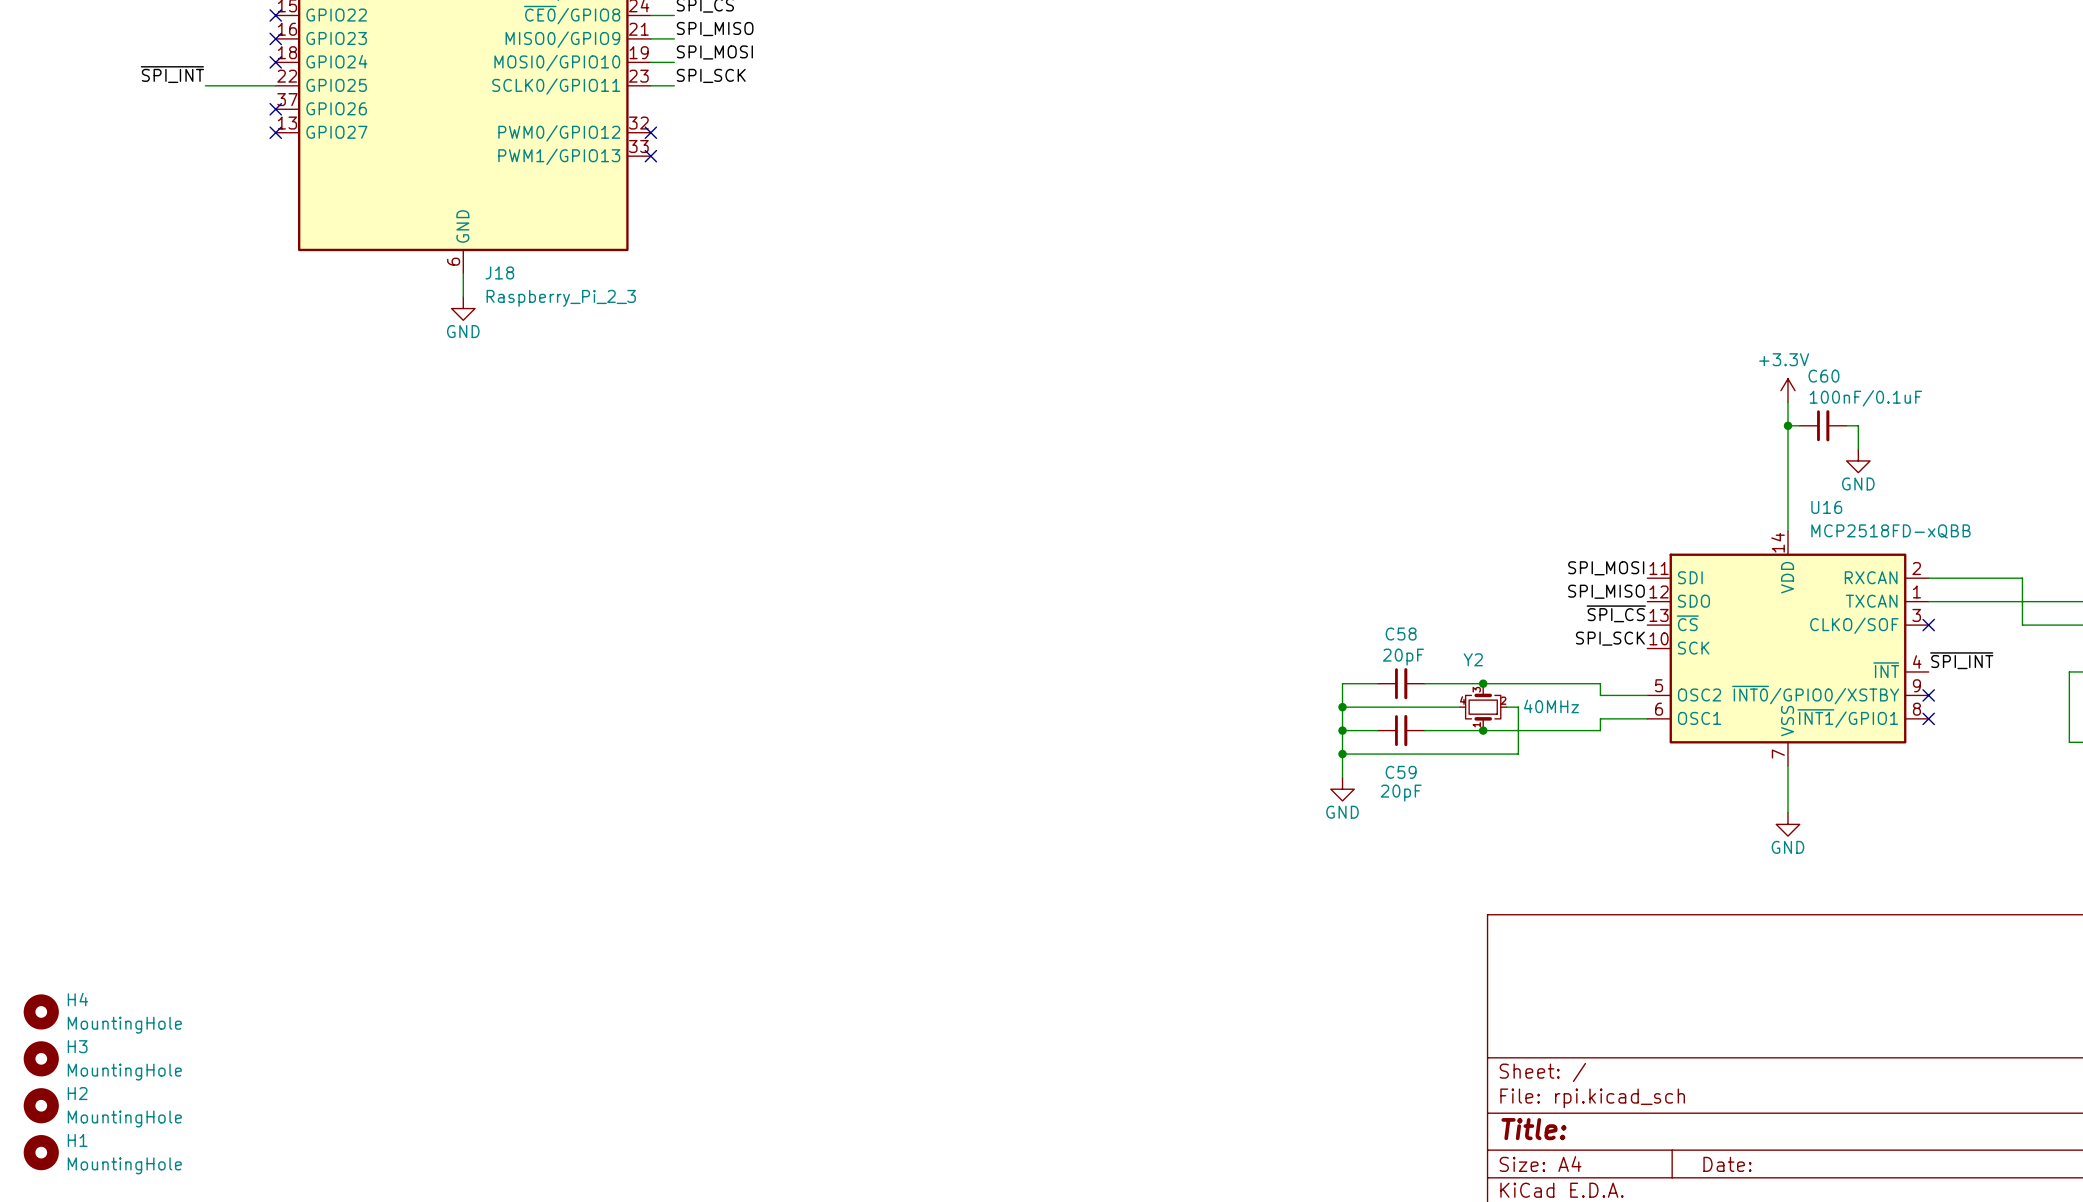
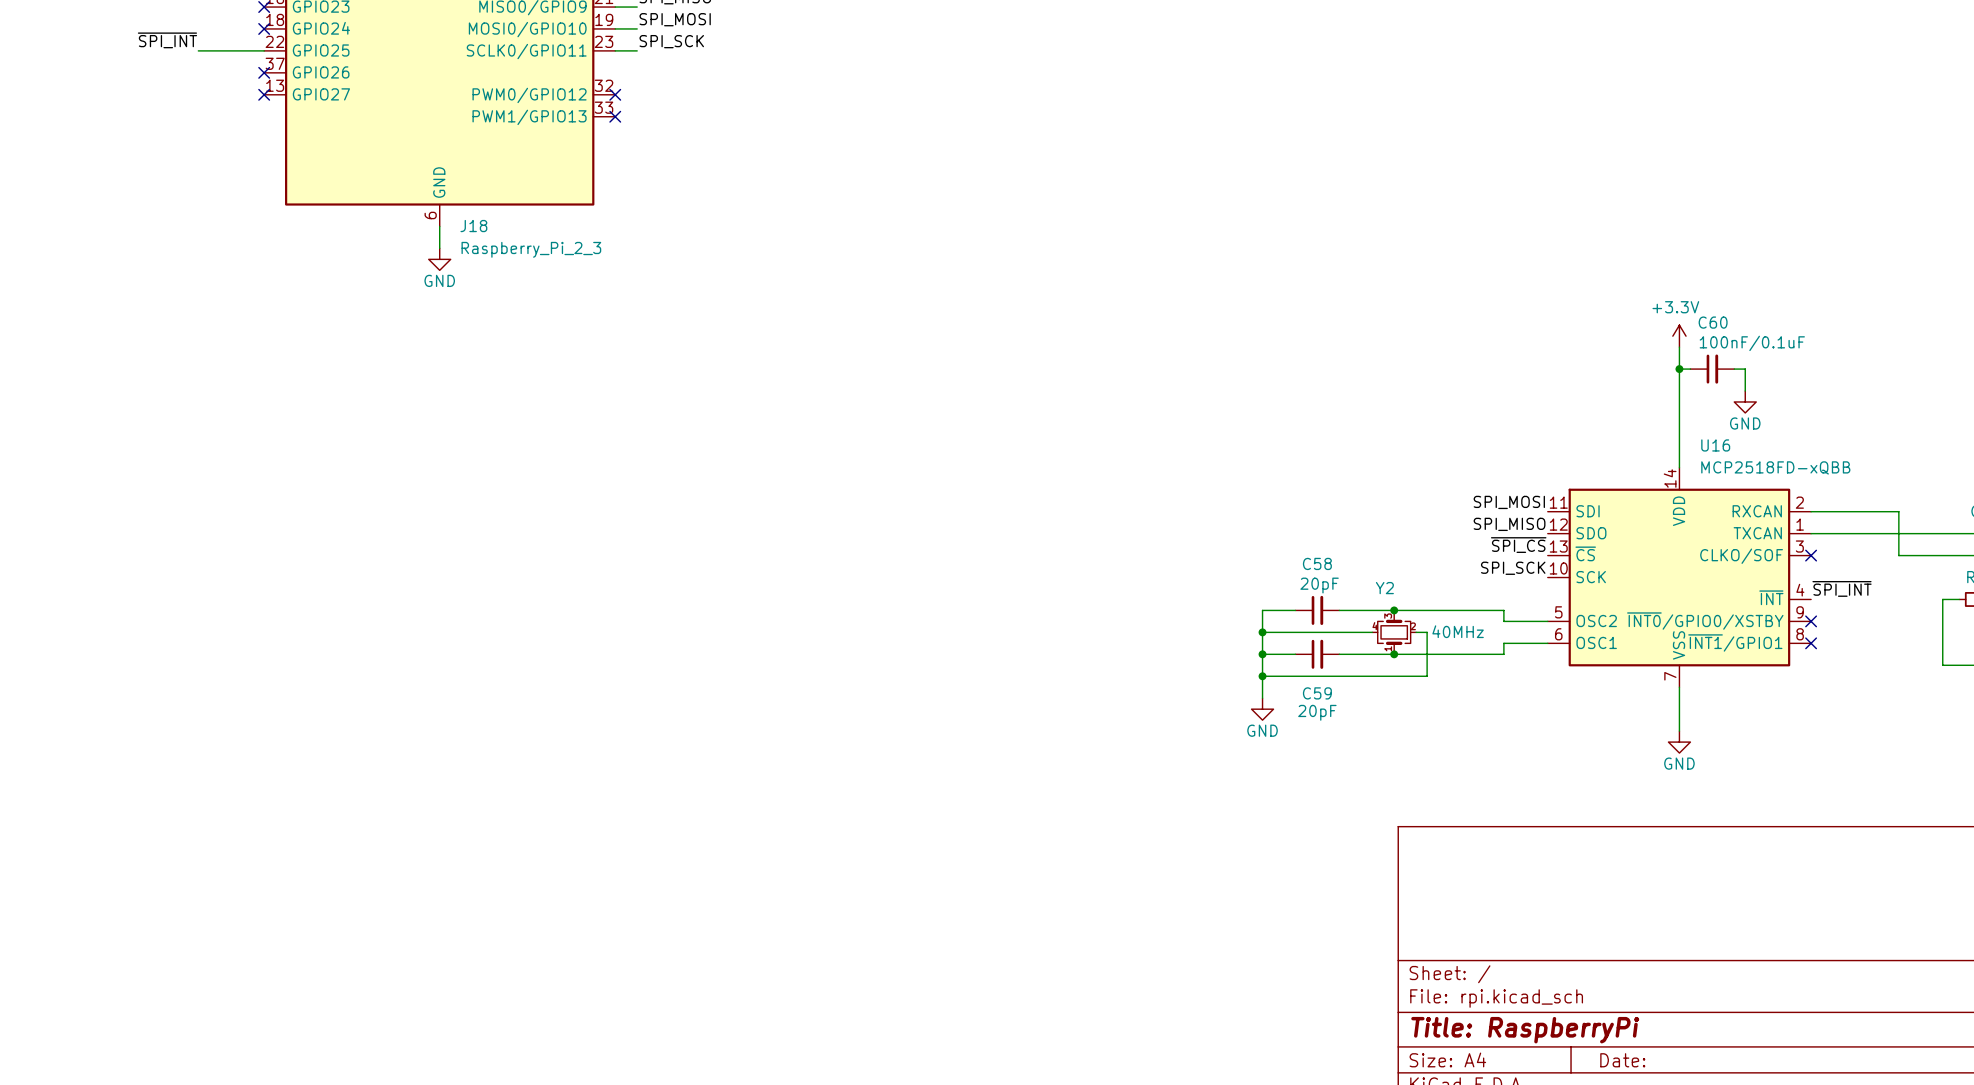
H4: MountingHole (41, 1011) -> none
H3: MountingHole (41, 1058) -> none
H2: MountingHole (41, 1105) -> none
title block: Title: (1533, 1129) -> Title: RaspberryPi (1525, 1030)
H1: MountingHole (41, 1152) -> none

